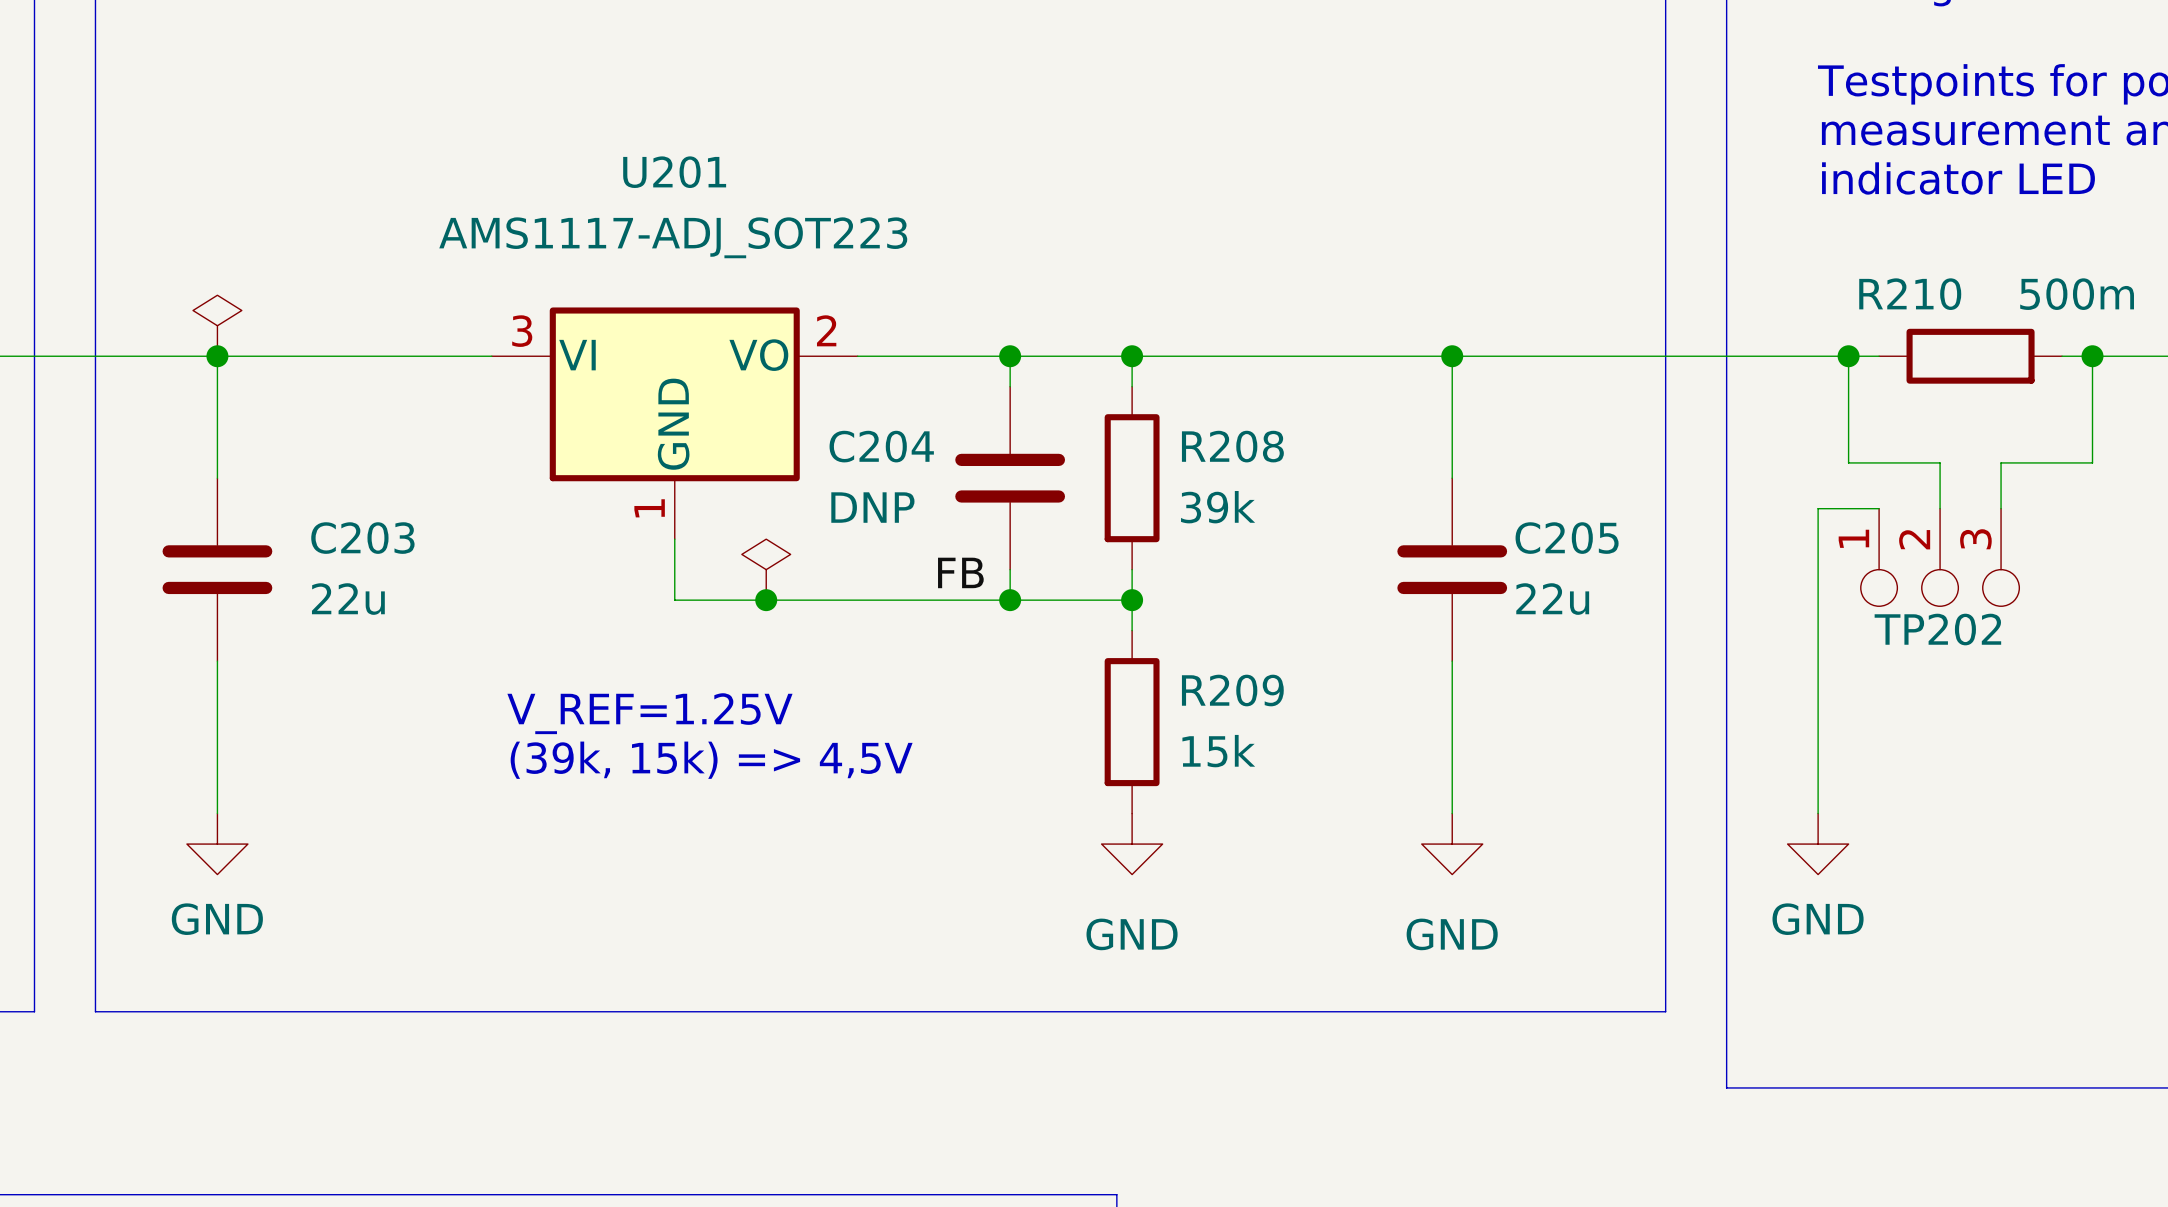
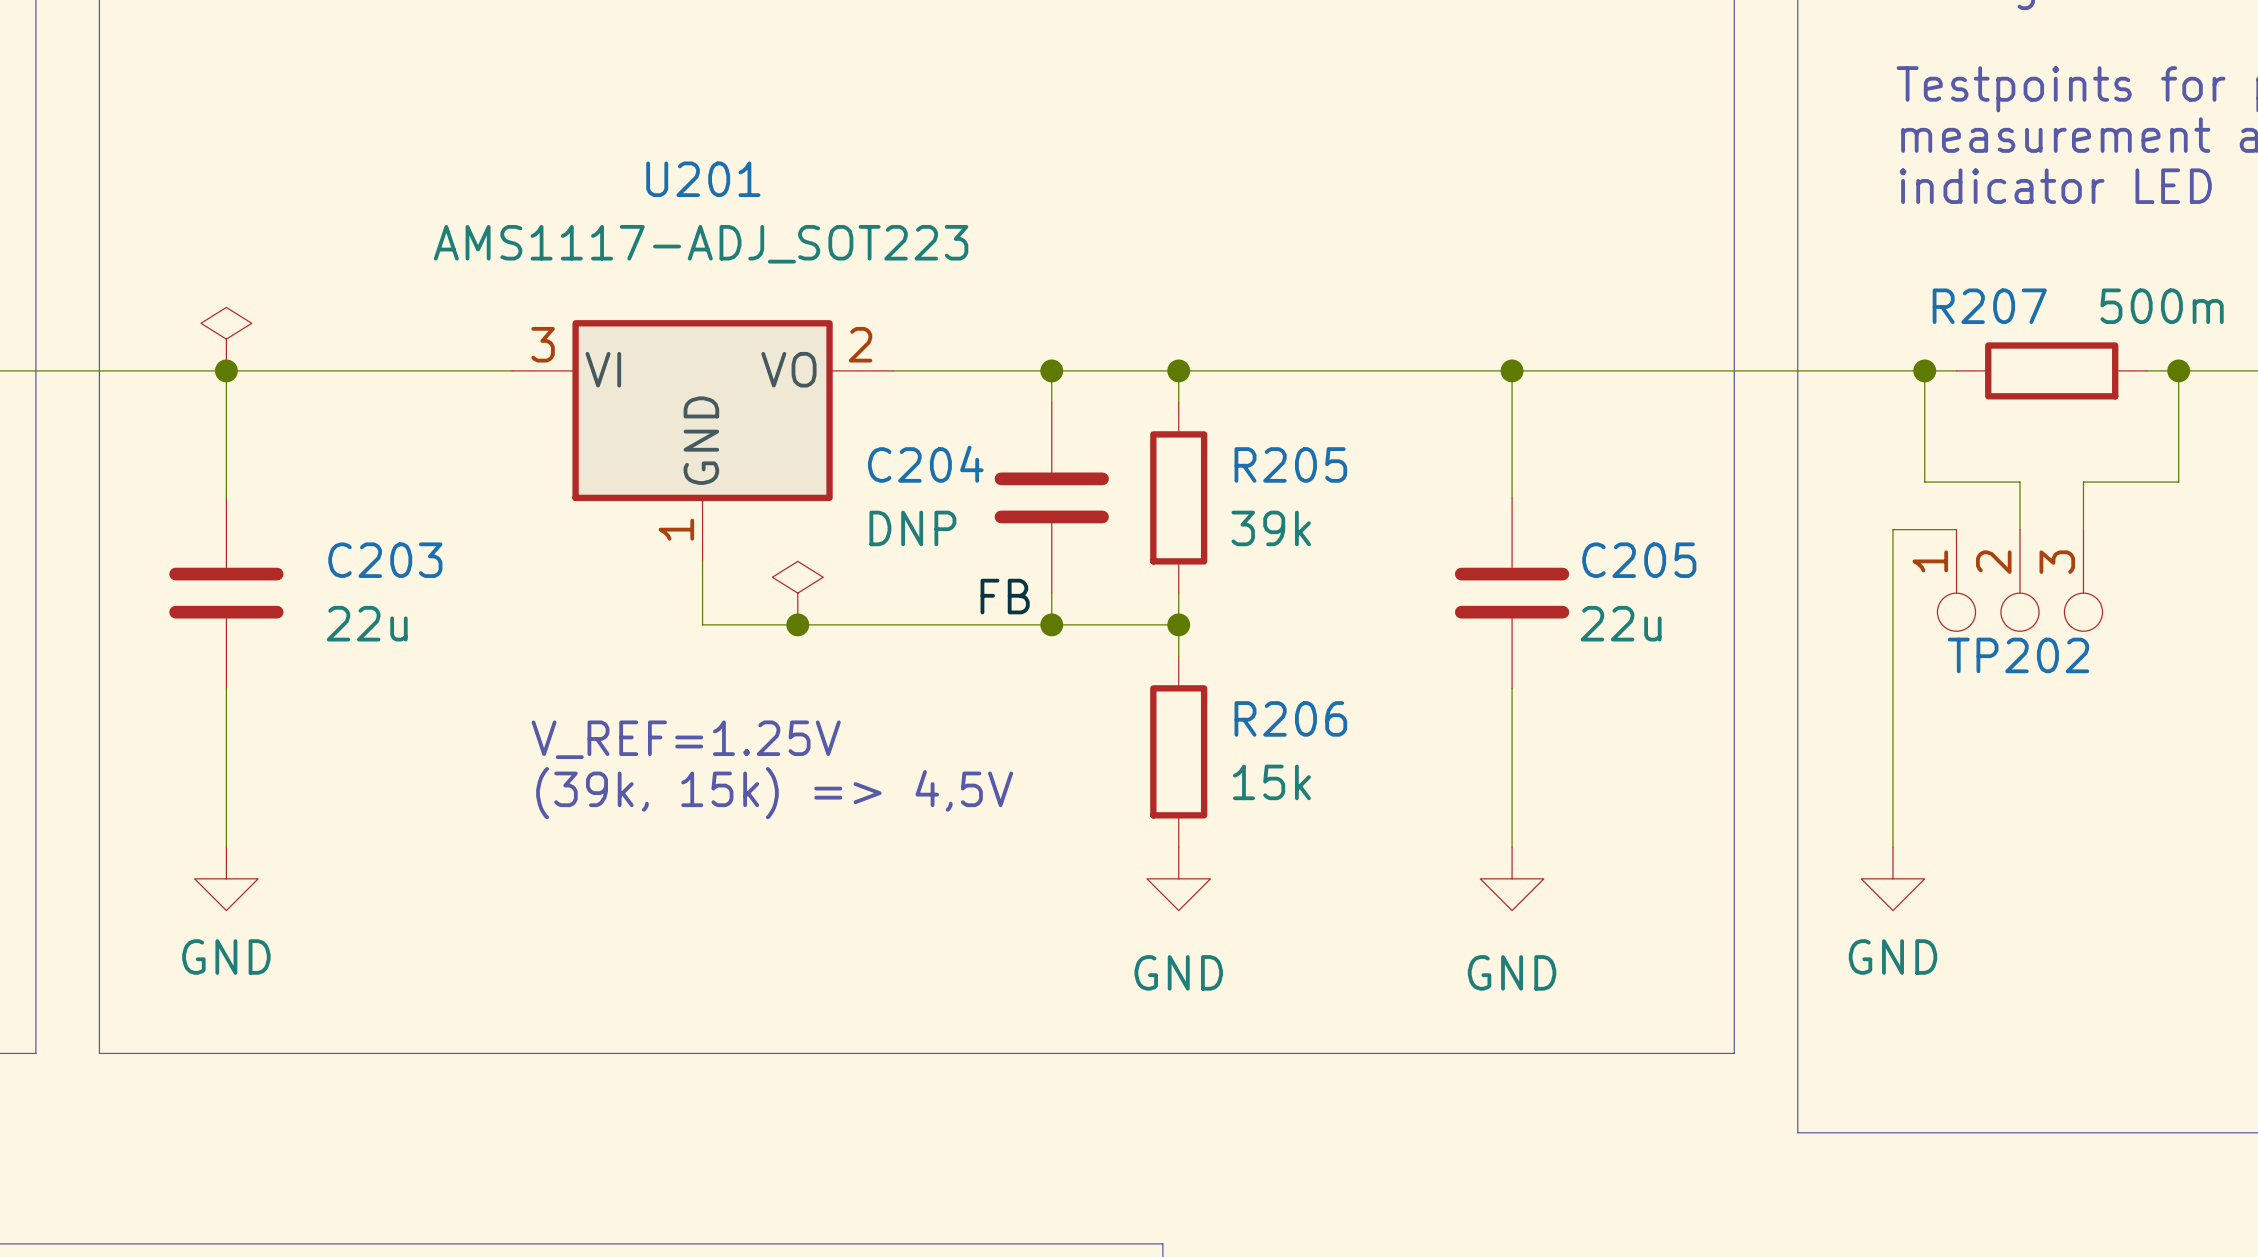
R210 name: R210 (1910, 294) -> R207 (1989, 306)
R208 name: R208 (1232, 446) -> R205 (1290, 464)
R209 name: R209 (1232, 690) -> R206 (1290, 718)

